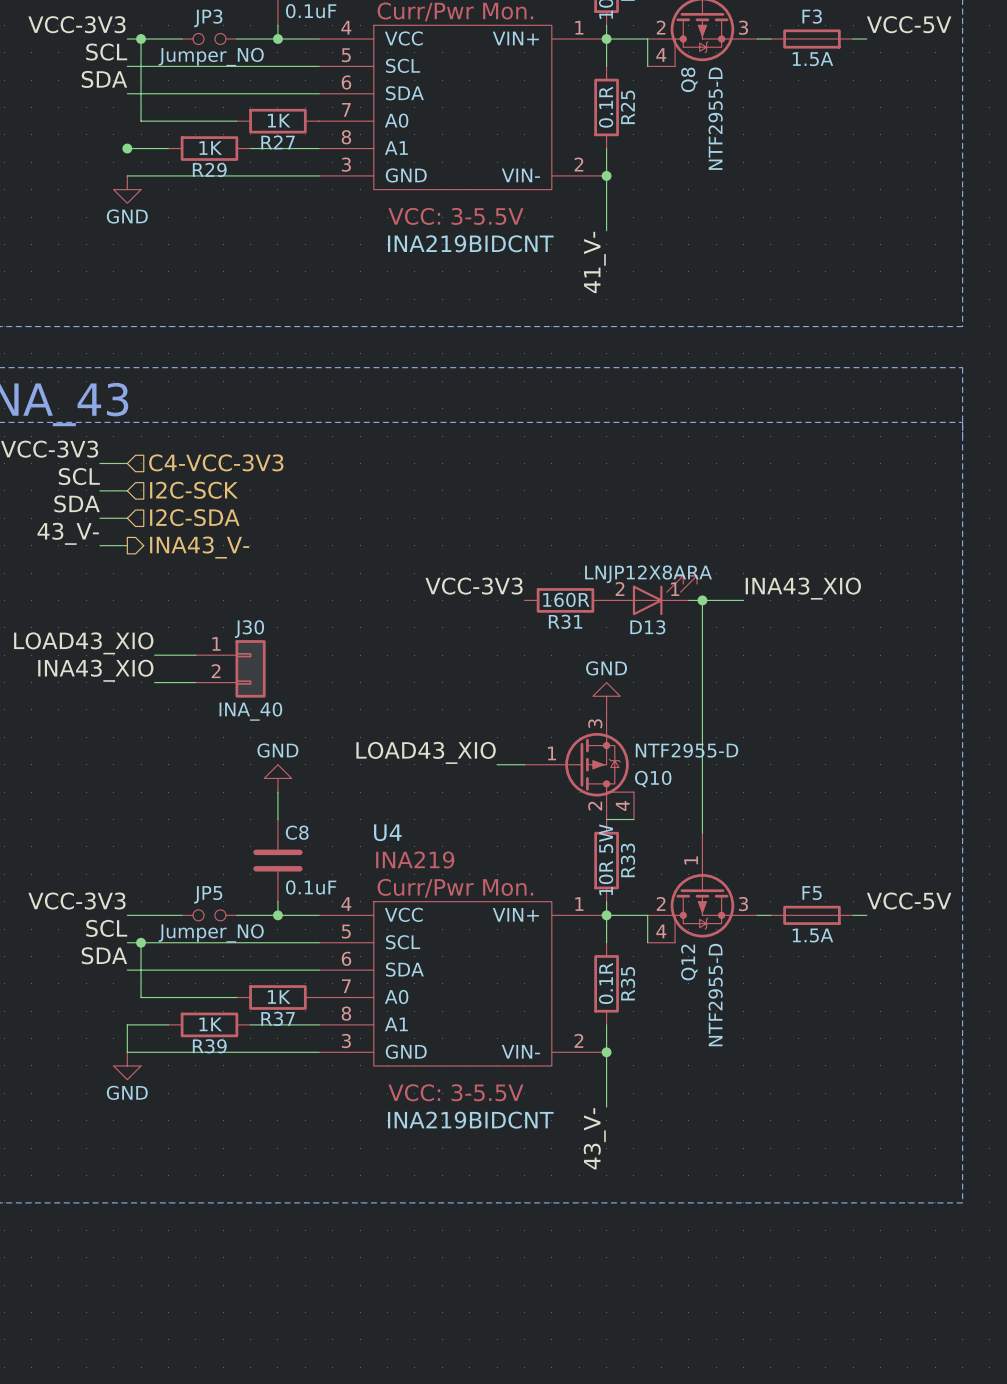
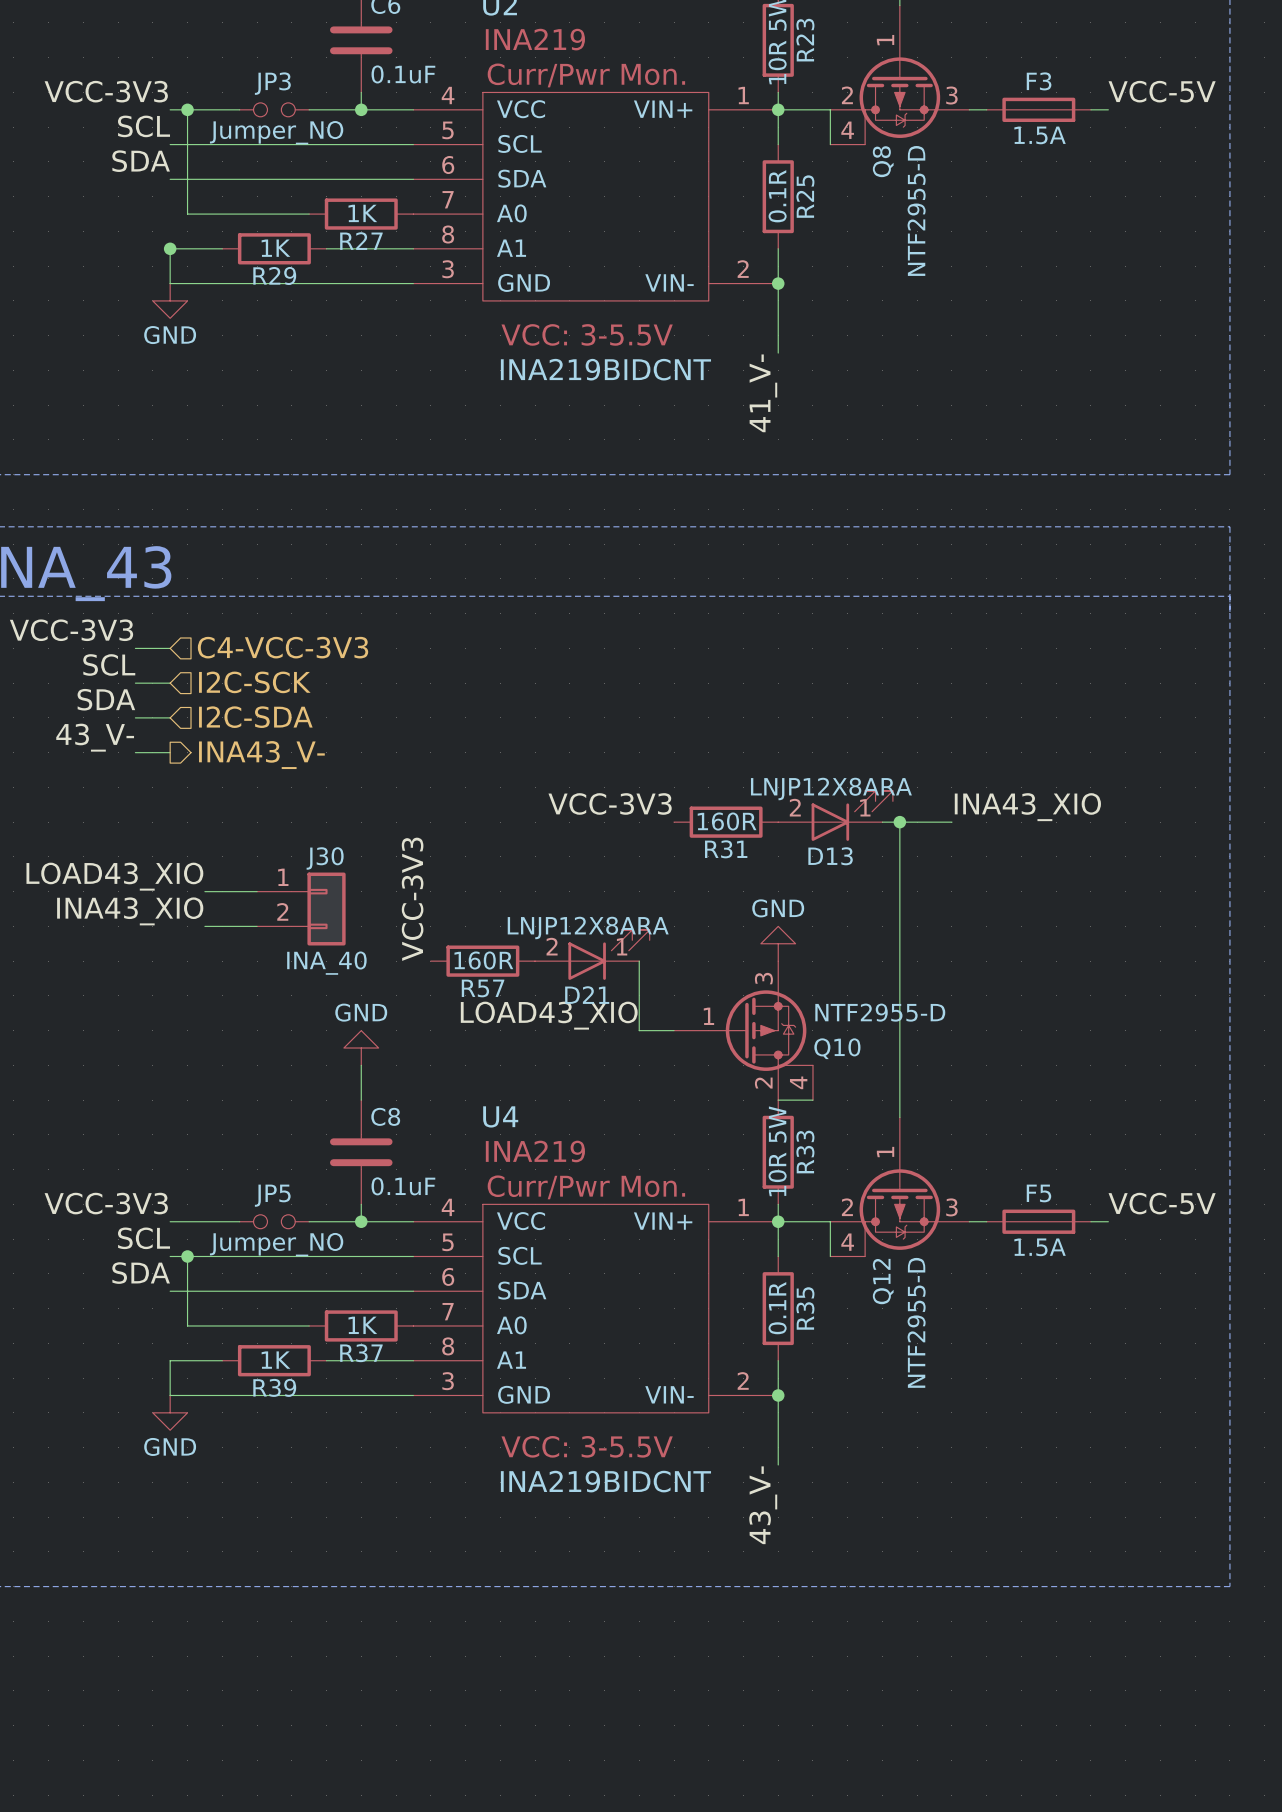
wire: none -> (170, 248) (170, 283)
label: none -> VCC-3V3 (412, 899)
D21: none -> LNJP12X8ARA (592, 954)
R57: none -> 160R (482, 961)
wire: none -> (639, 961) (639, 1030)

